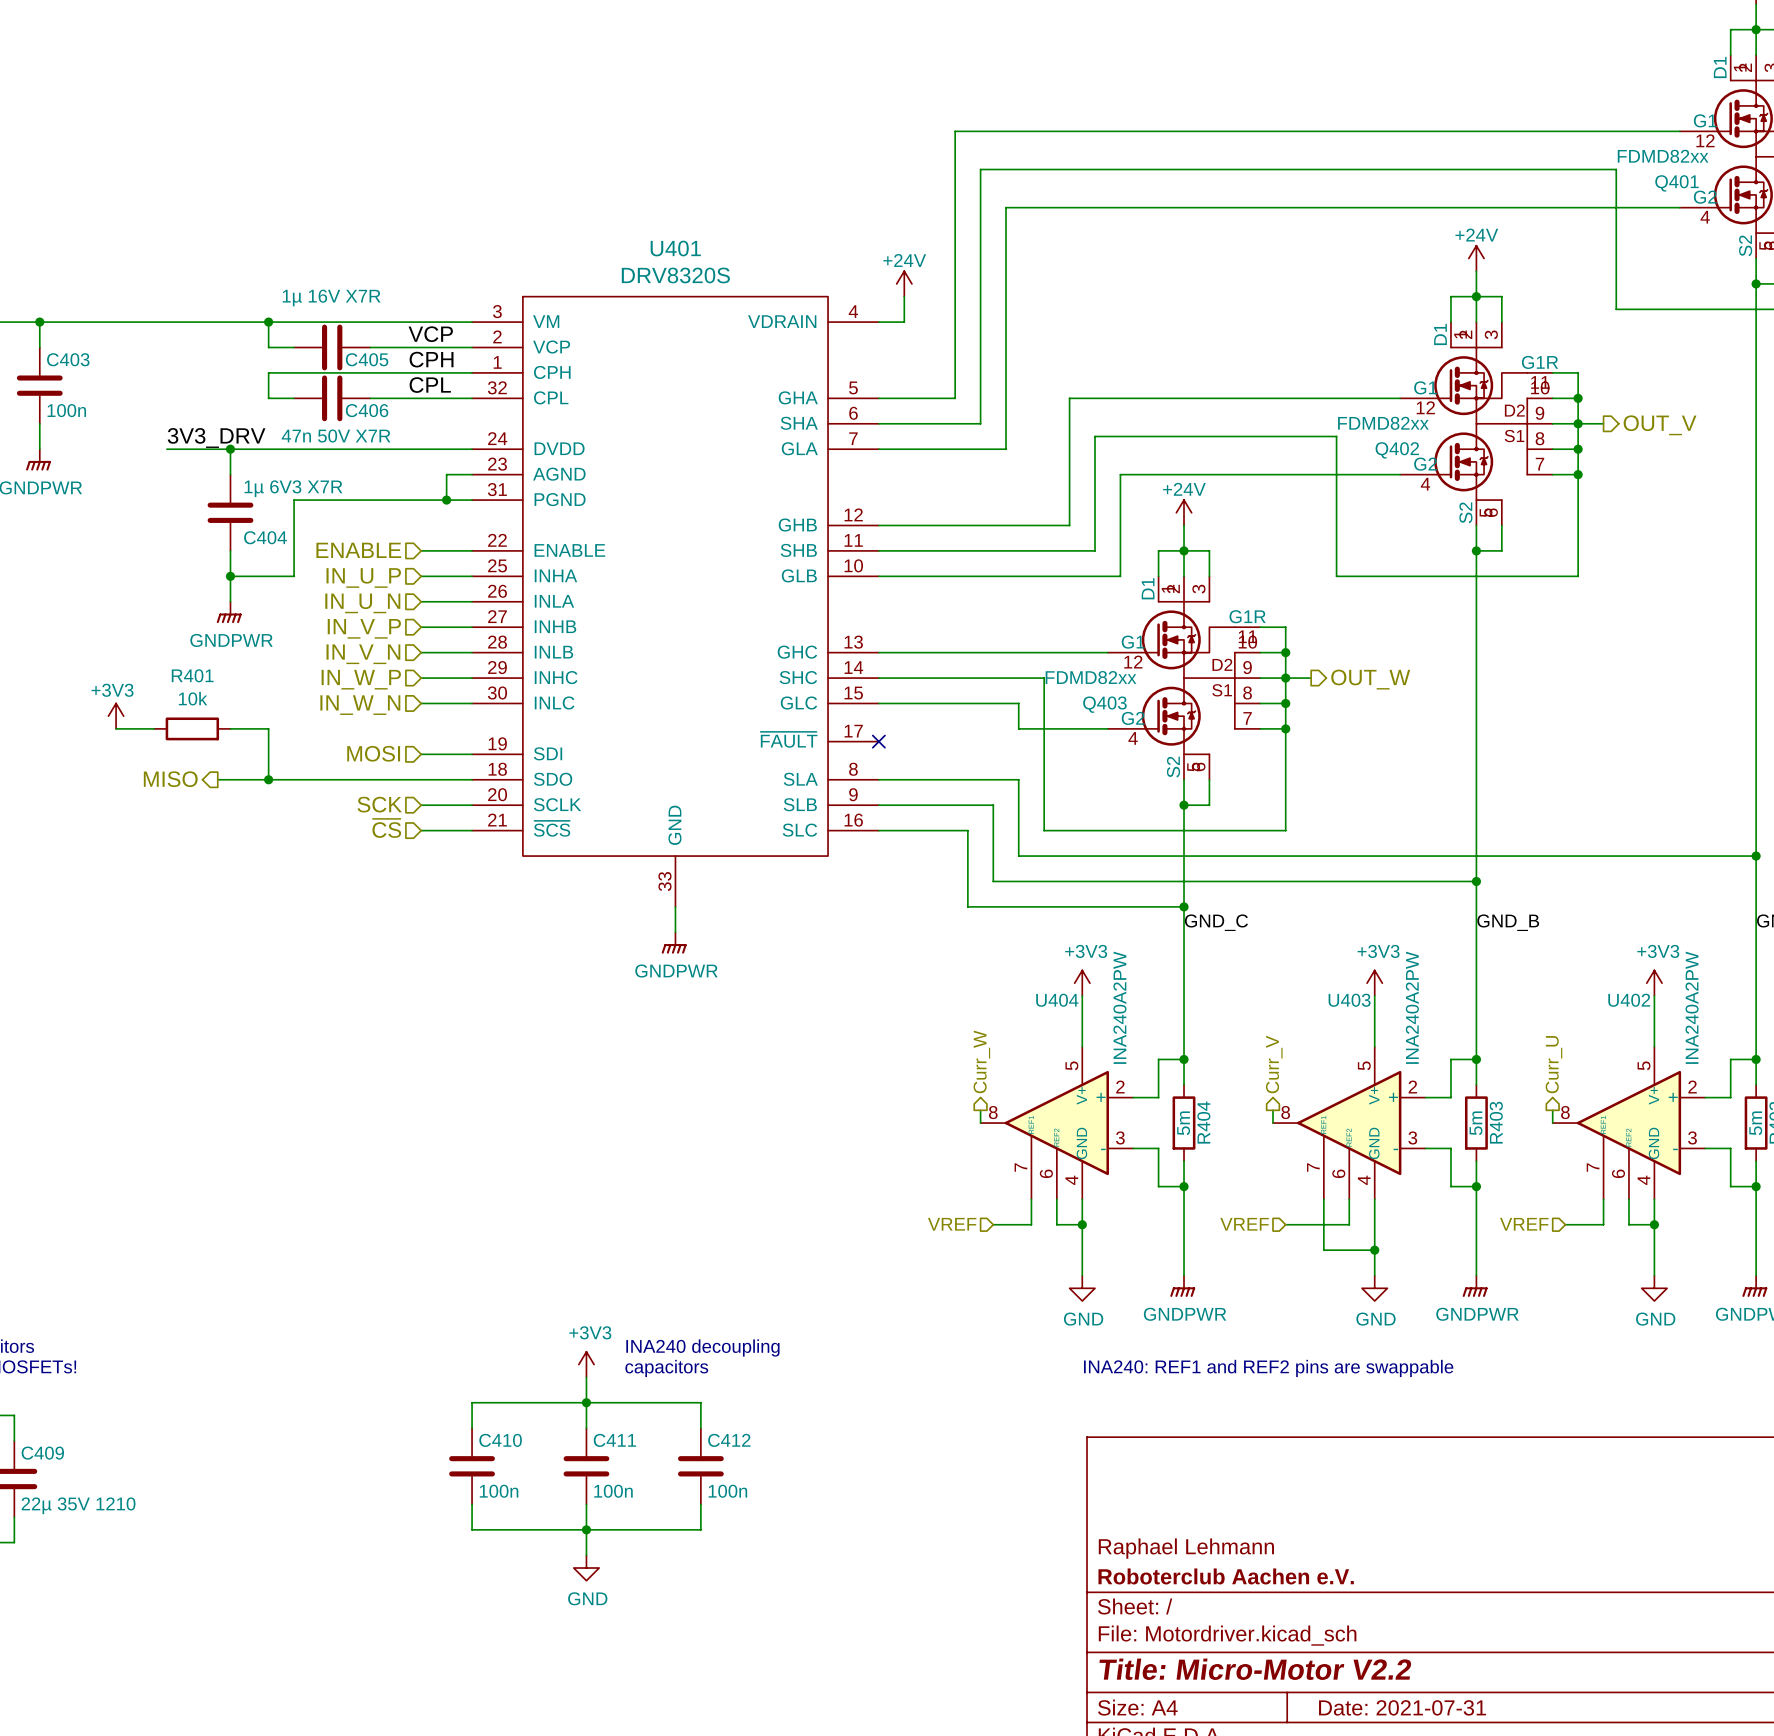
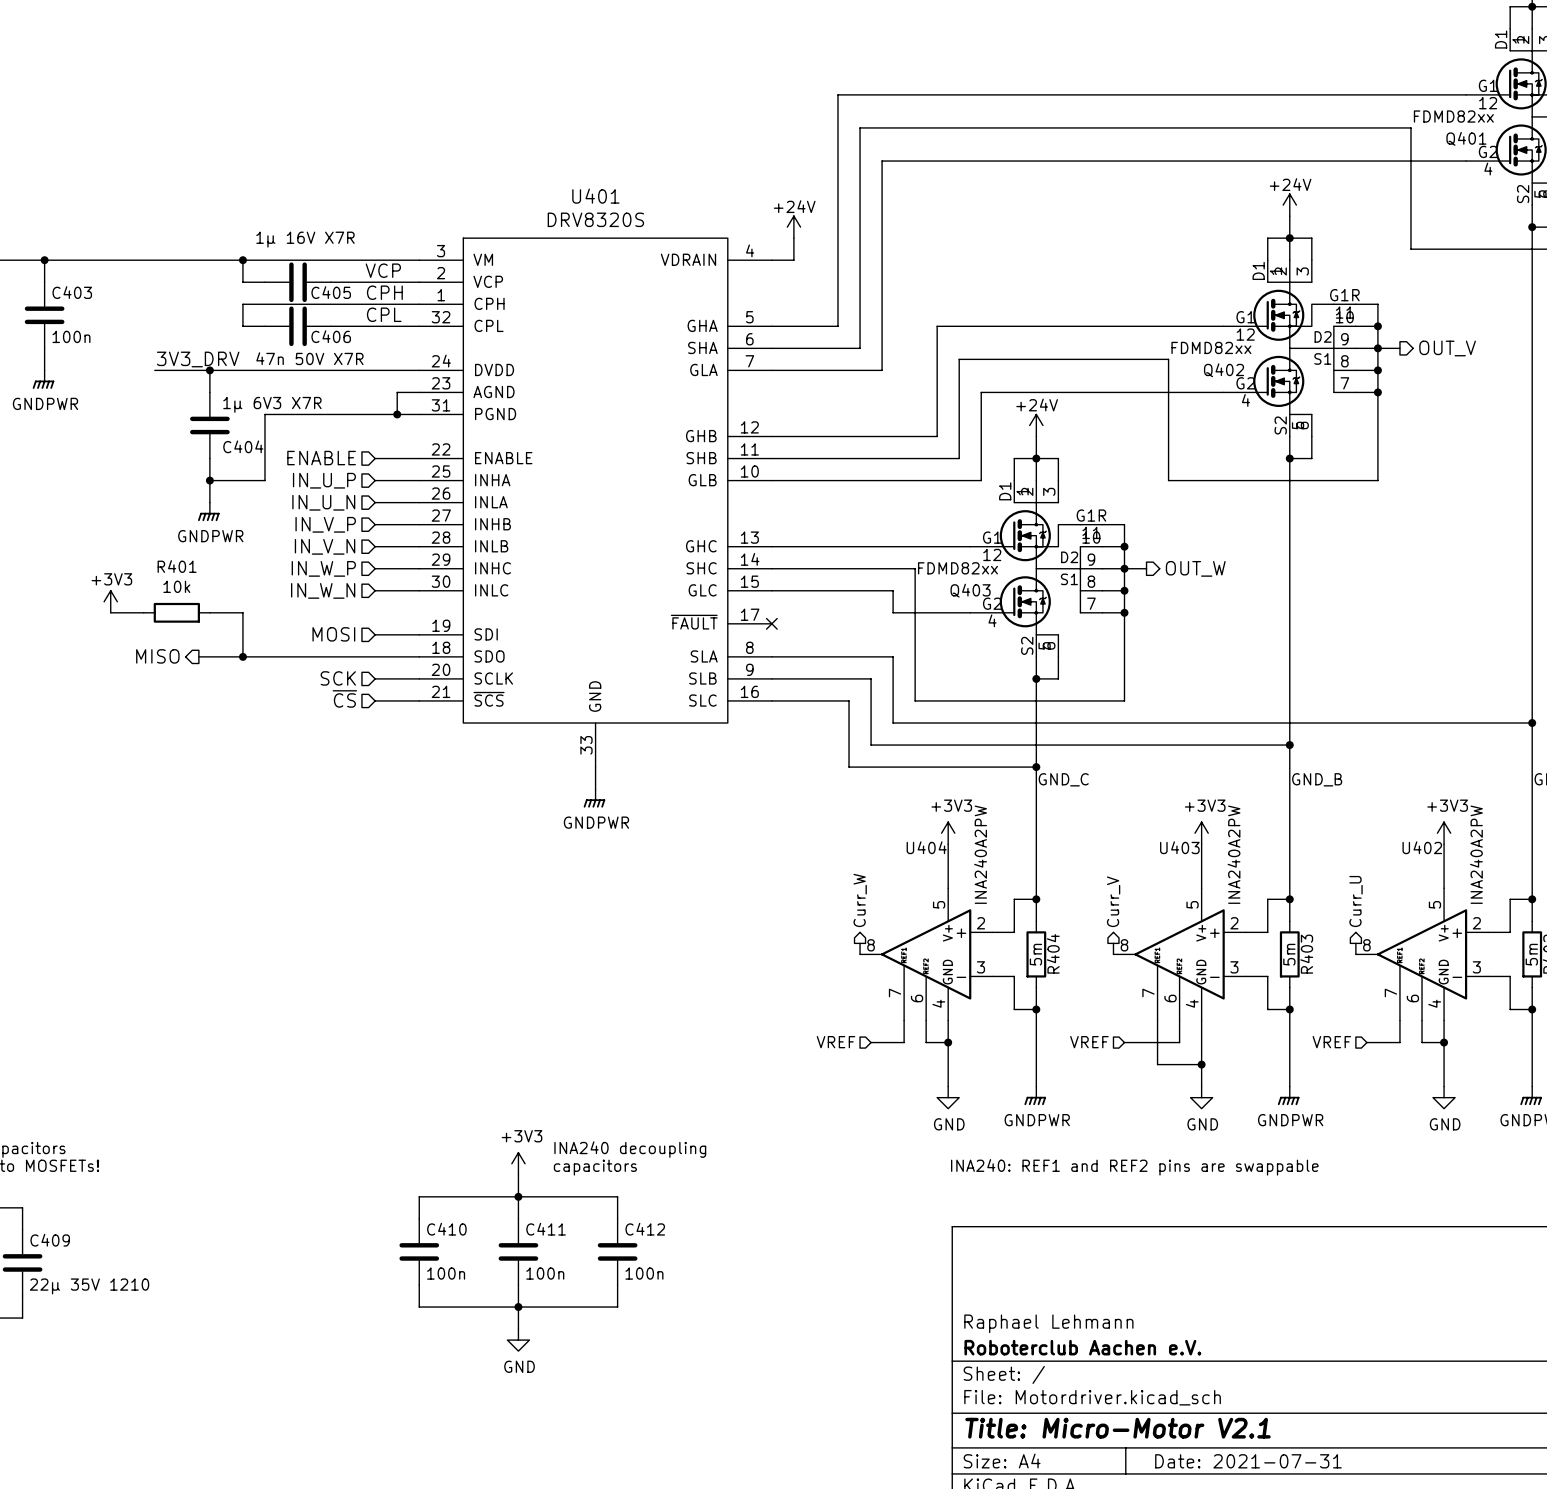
title block: Title: Micro-Motor V2.2 (1255, 1669) -> Title: Micro-Motor V2.1 (1118, 1428)

